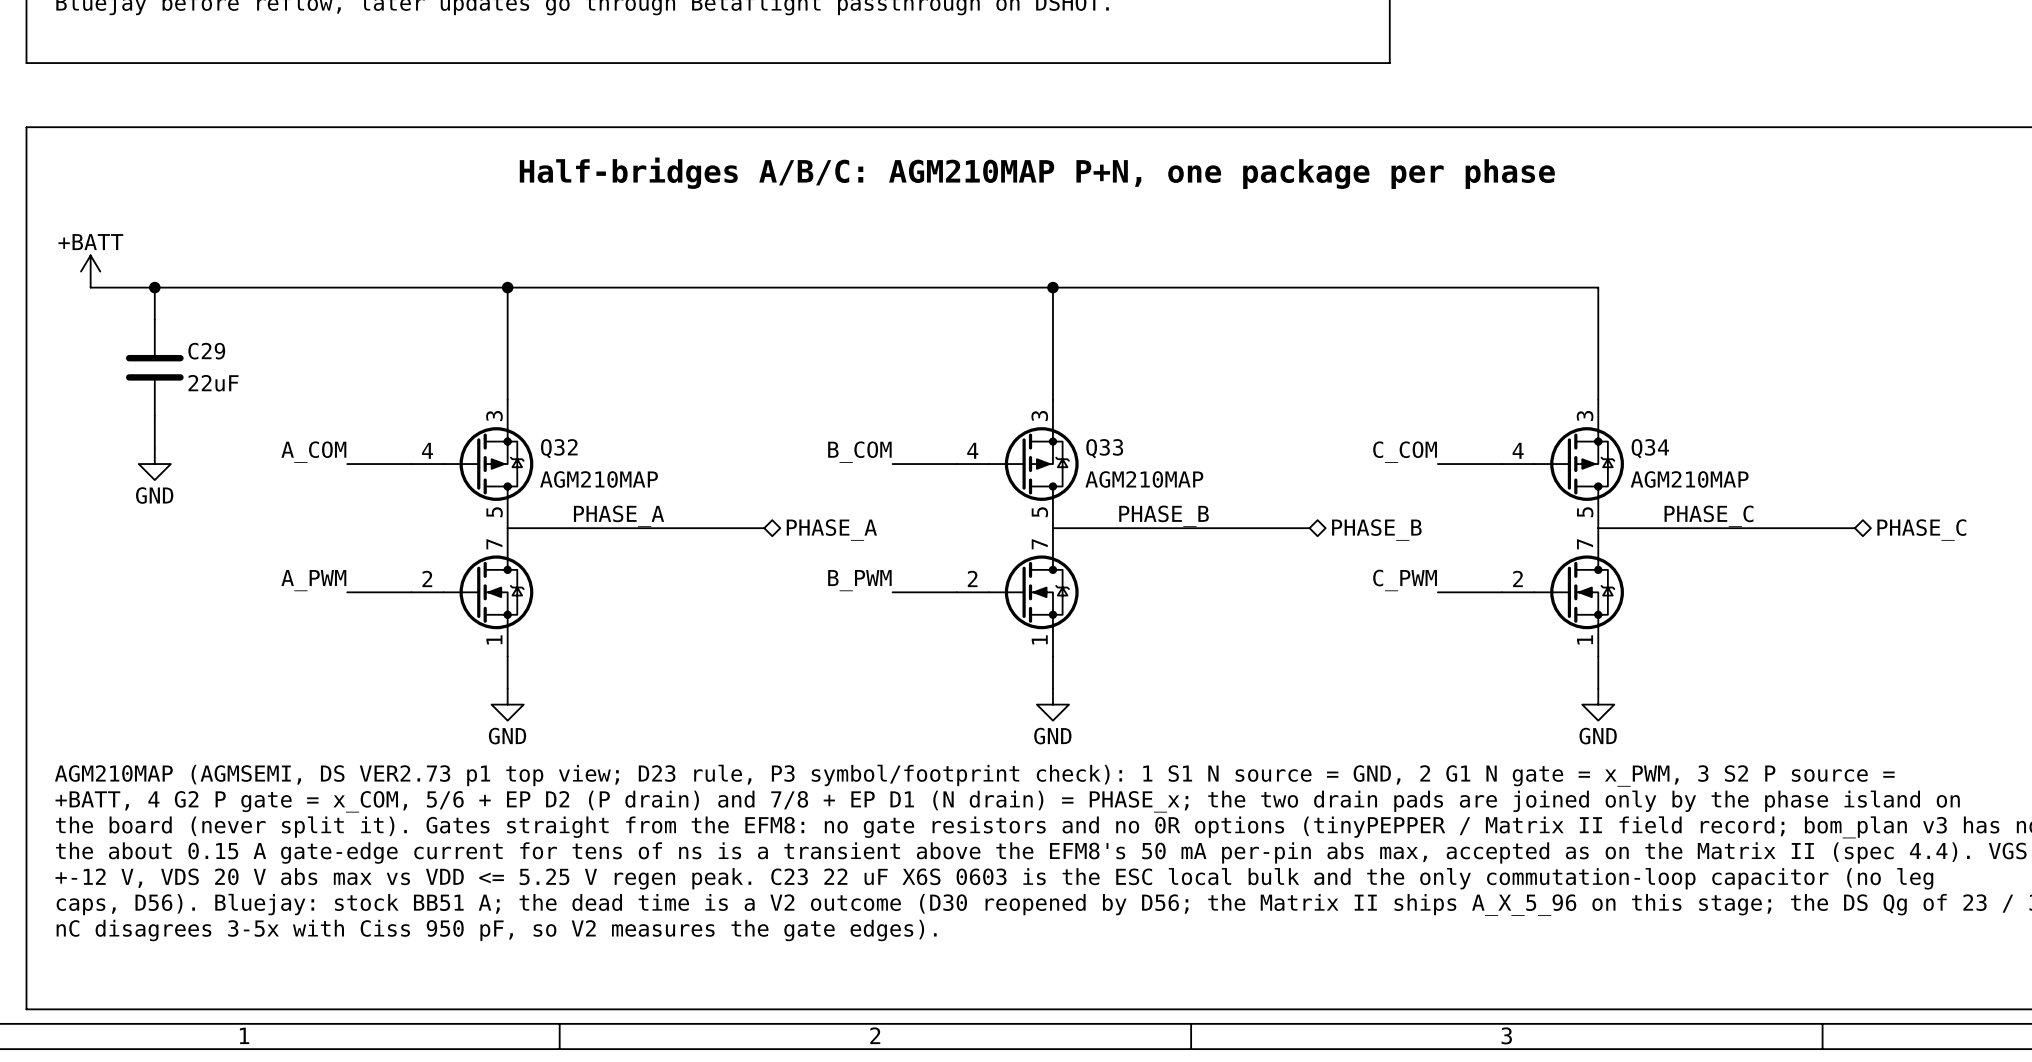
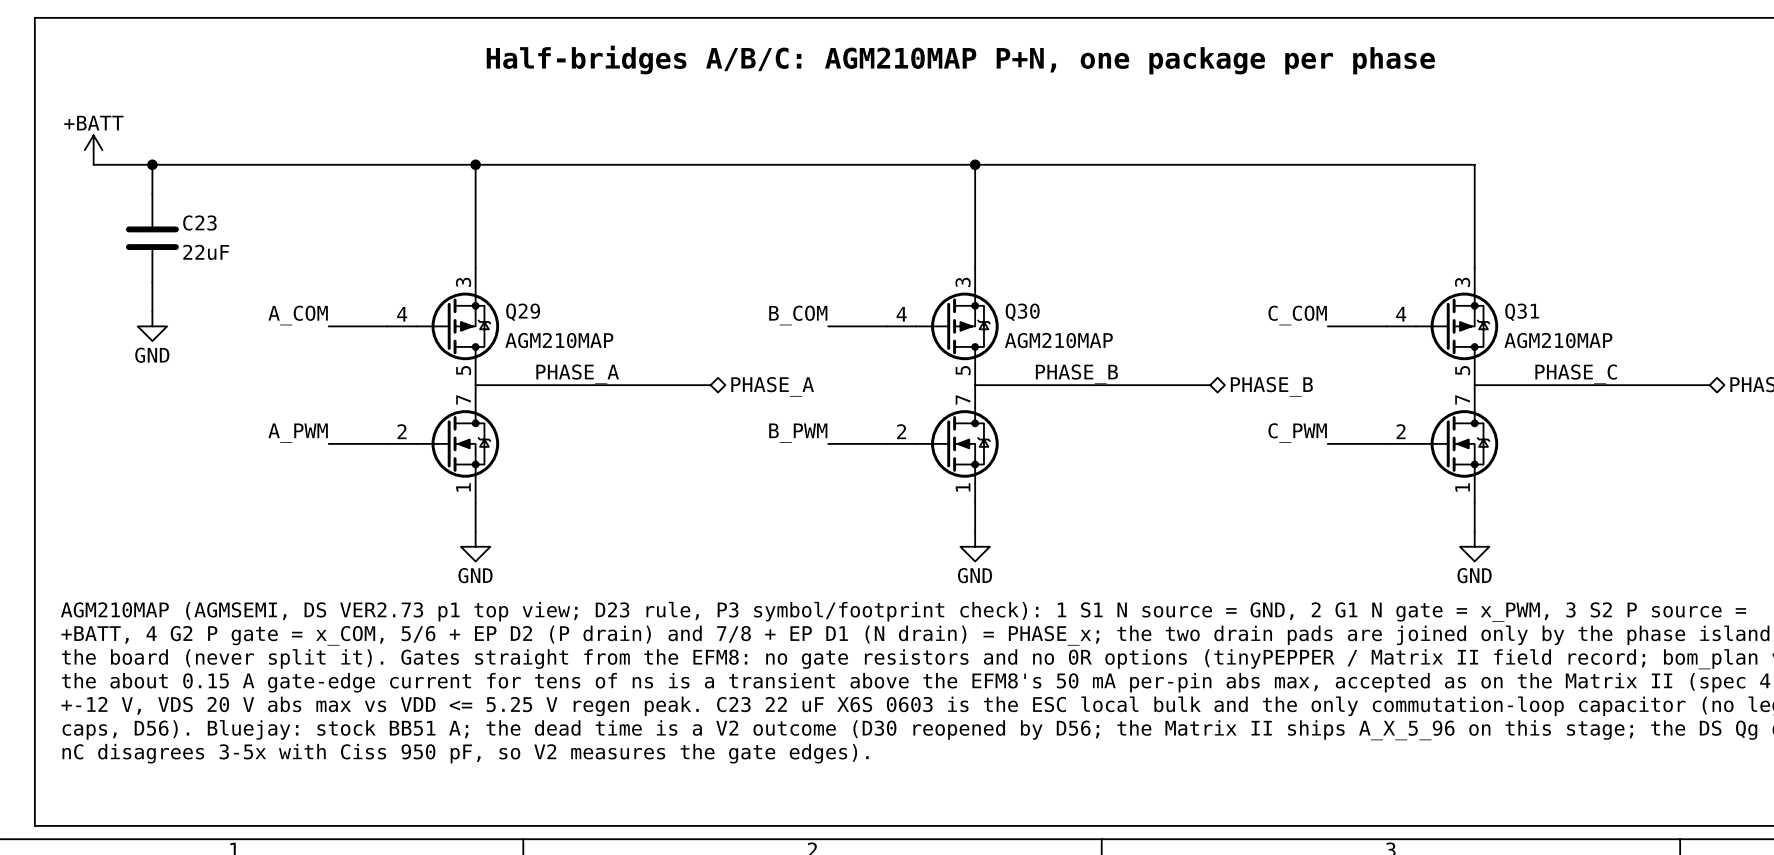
C29 name: C29 (206, 351) -> C23 (199, 223)
Q32 name: Q32 (559, 448) -> Q29 (523, 312)
Q33 name: Q33 (1104, 448) -> Q30 (1022, 312)
Q34 name: Q34 (1650, 448) -> Q31 (1522, 312)

